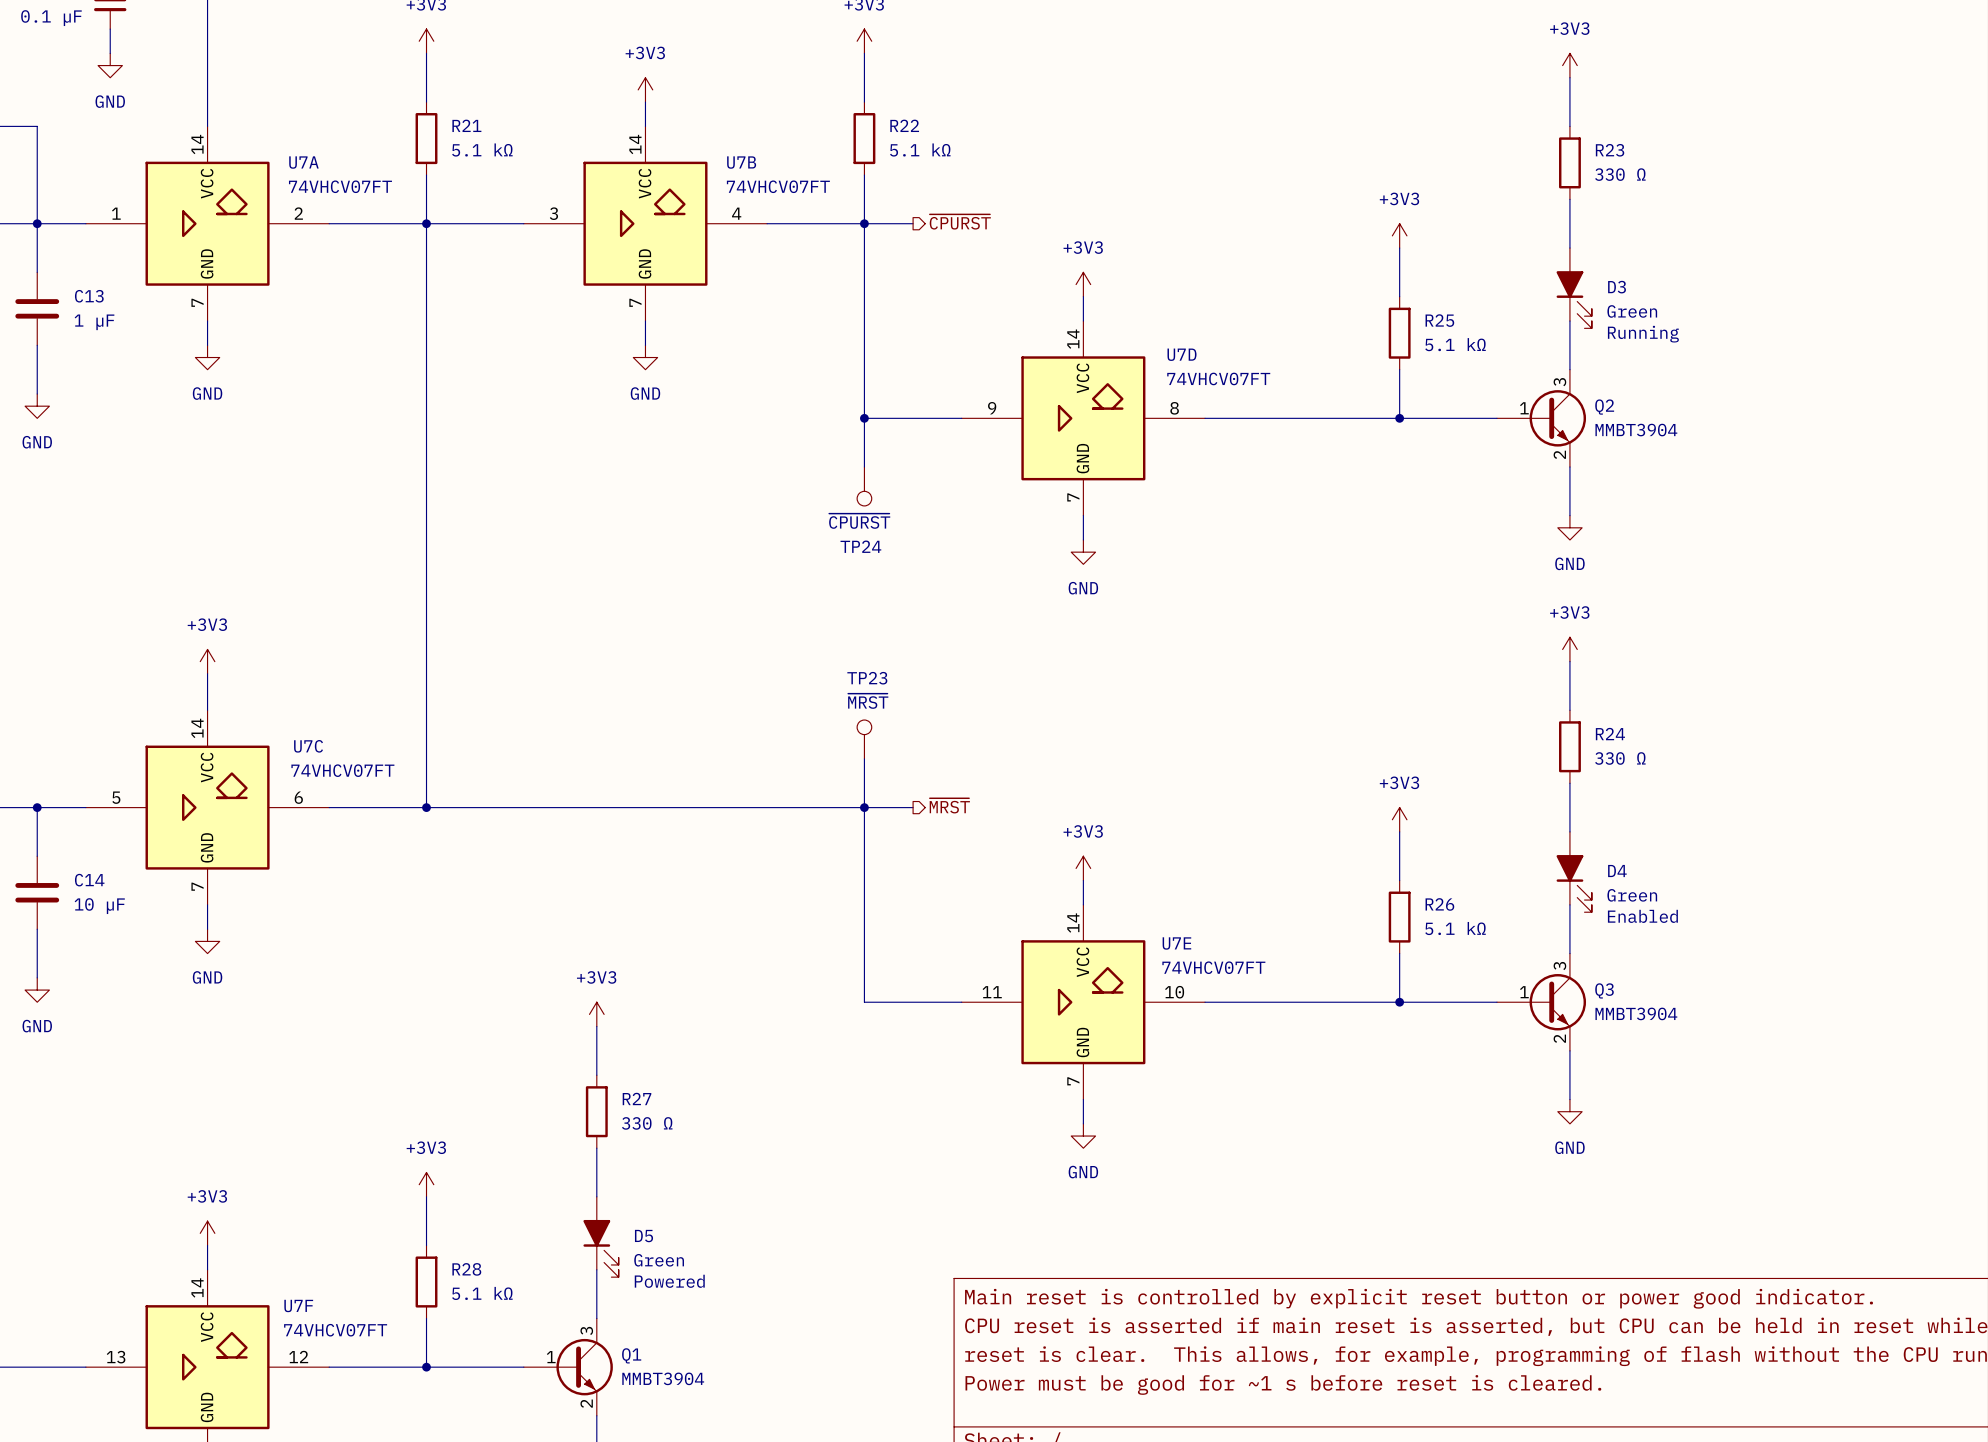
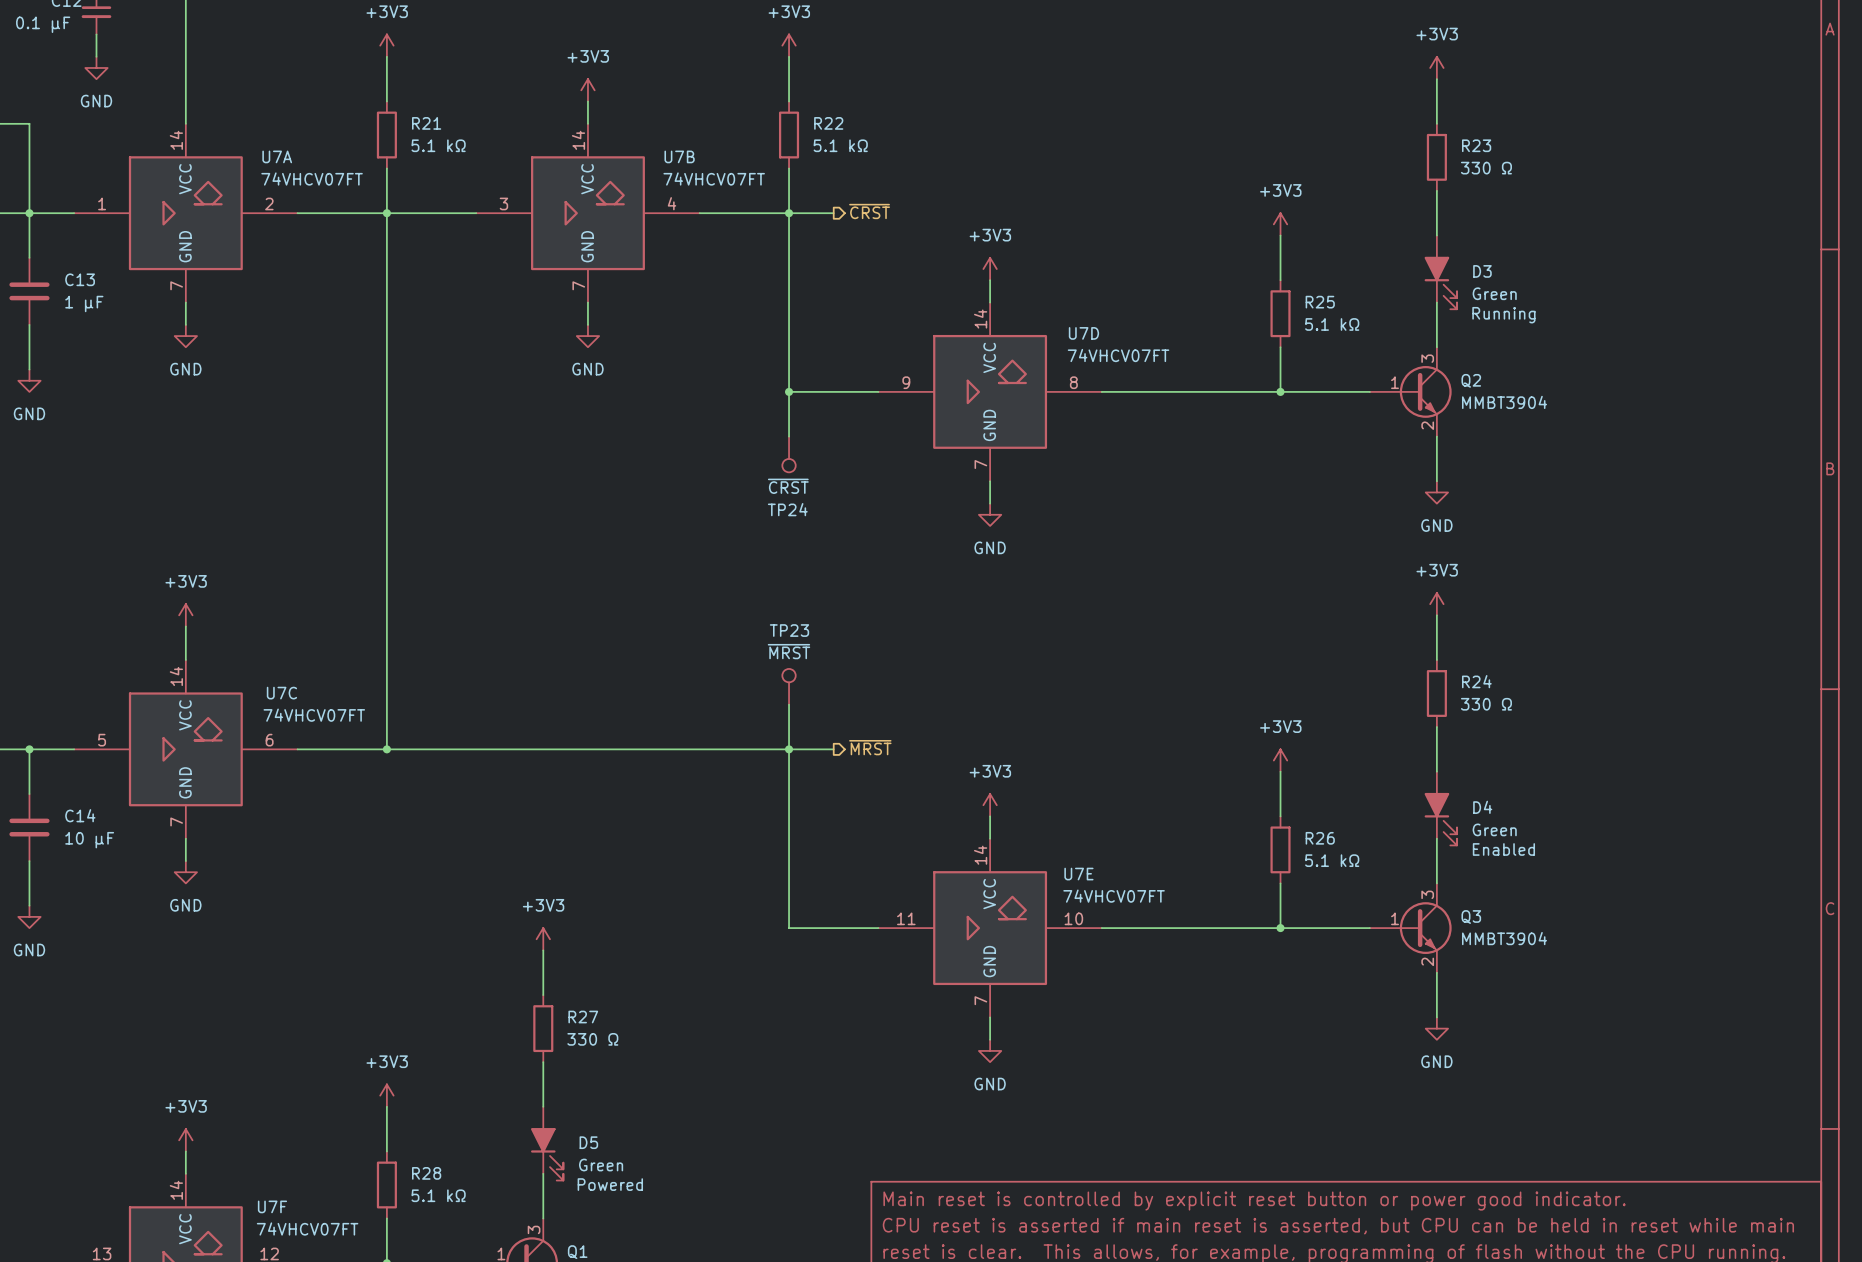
hierarchical label: ~{CPURST} (960, 221) -> ~{CRST} (869, 211)
TP24 value: ~{CPURST} (859, 521) -> ~{CRST} (788, 486)

